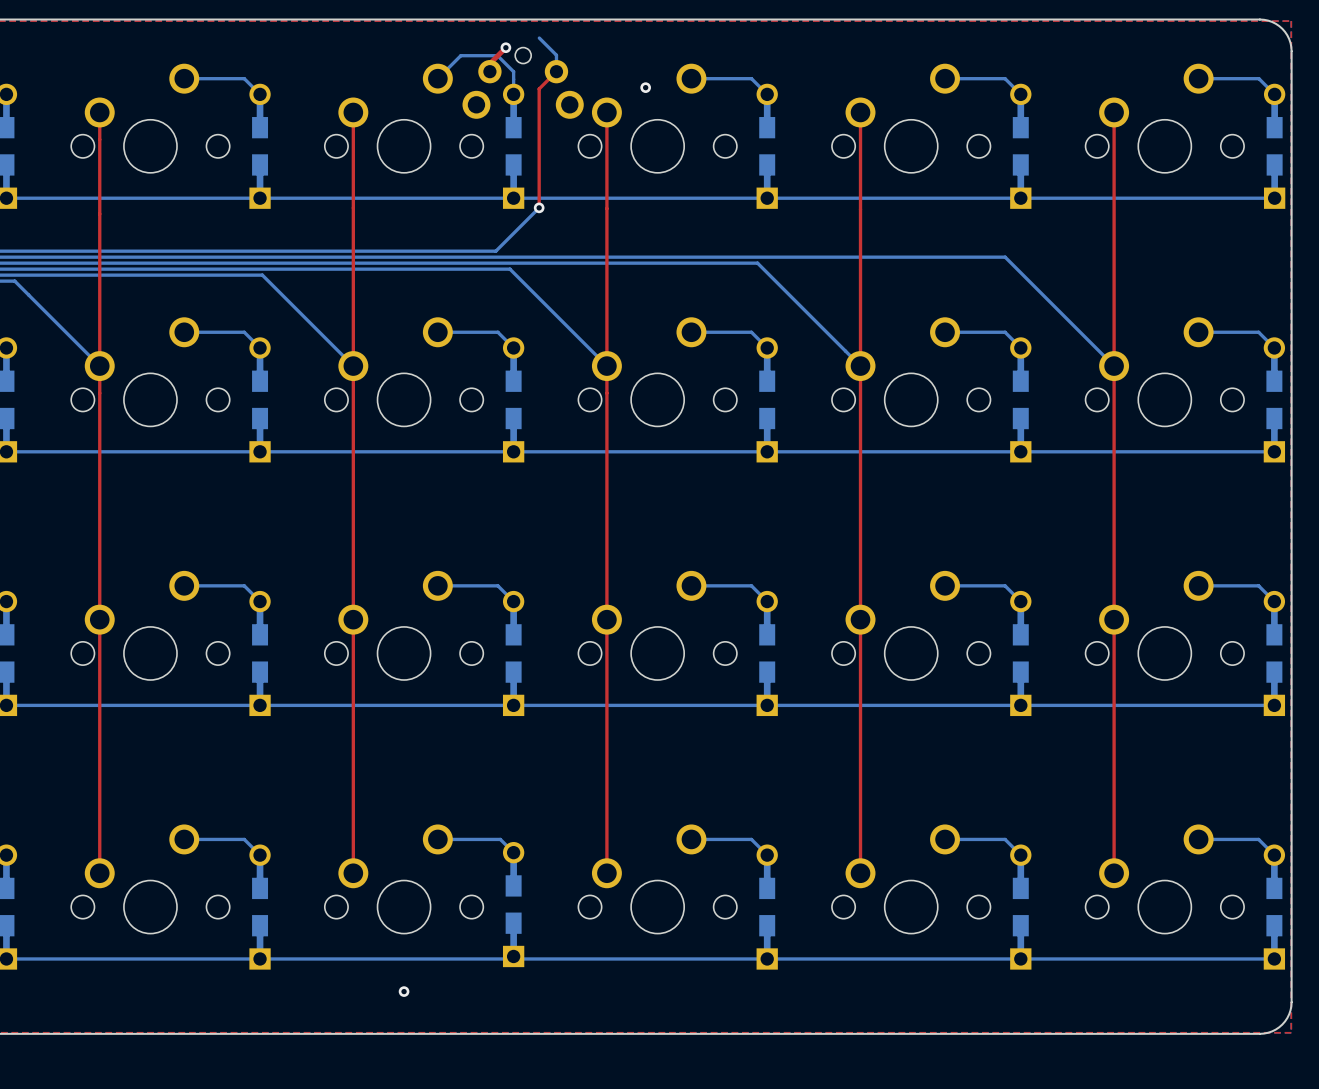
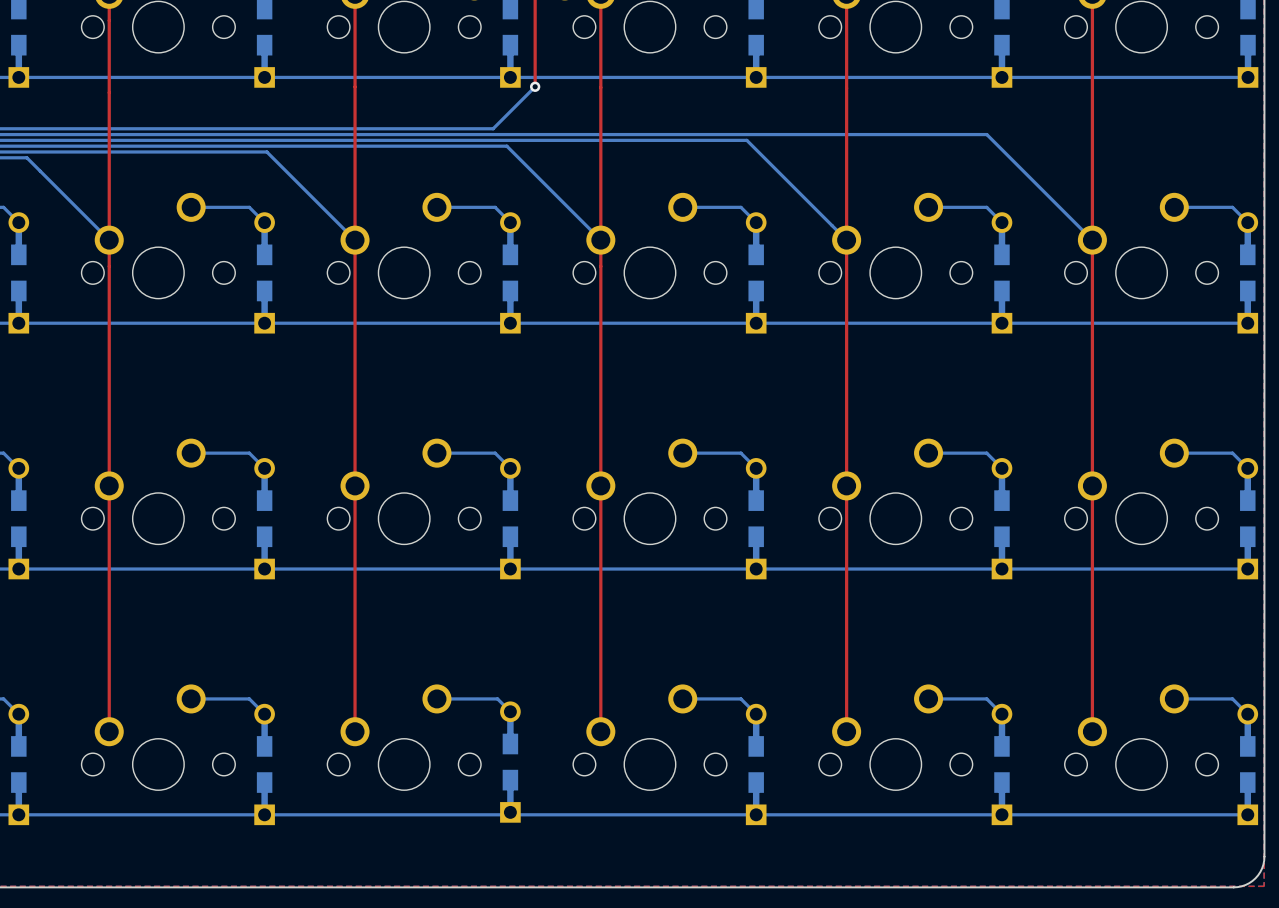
via: (404, 991) -> none

